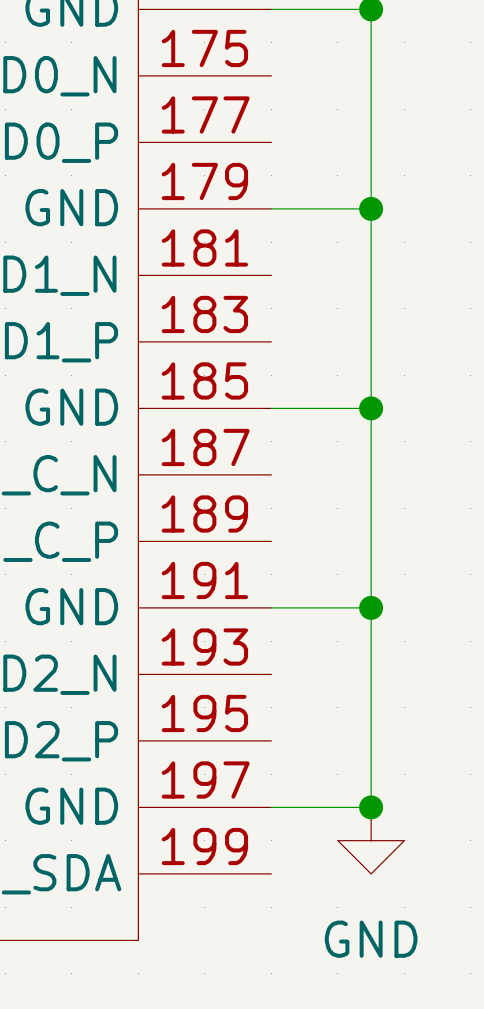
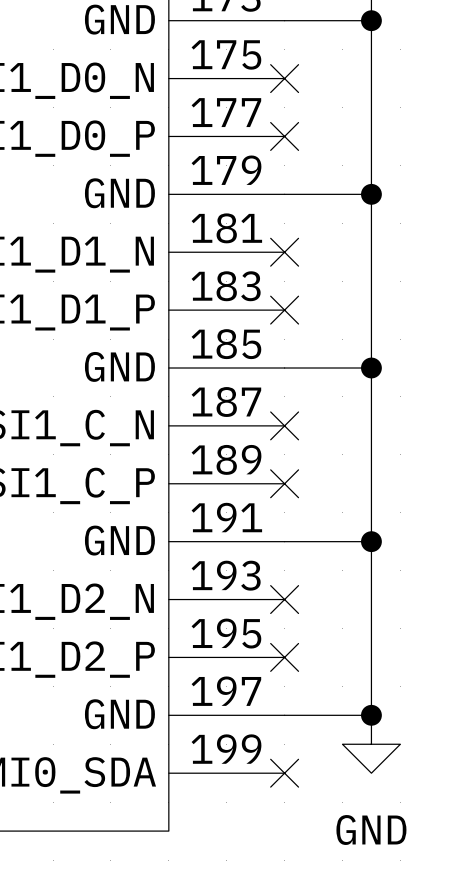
no-connect mark: none -> (284, 78)
no-connect mark: none -> (284, 136)
no-connect mark: none -> (284, 252)
no-connect mark: none -> (284, 310)
no-connect mark: none -> (284, 425)
no-connect mark: none -> (284, 483)
no-connect mark: none -> (284, 599)
no-connect mark: none -> (284, 657)
no-connect mark: none -> (284, 773)

